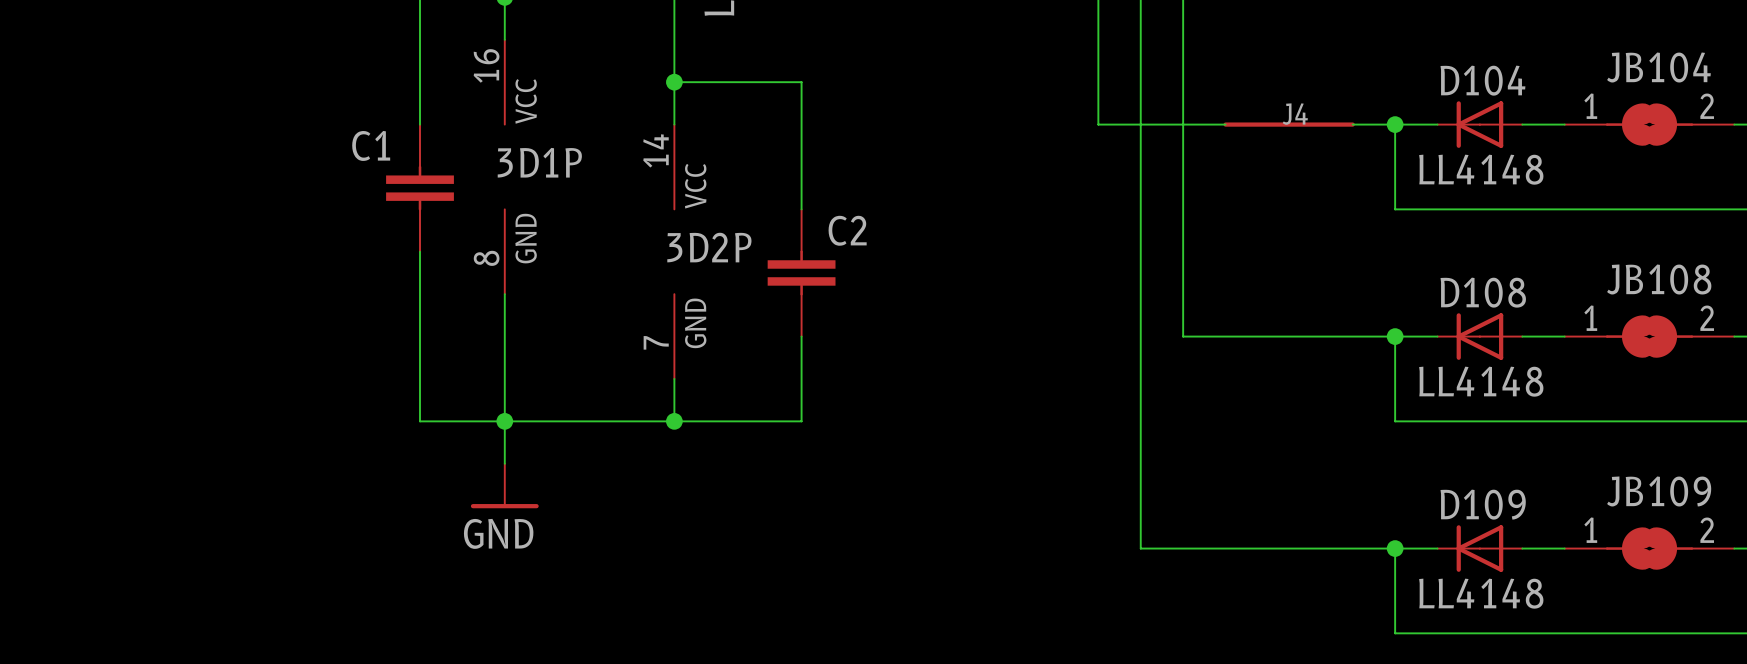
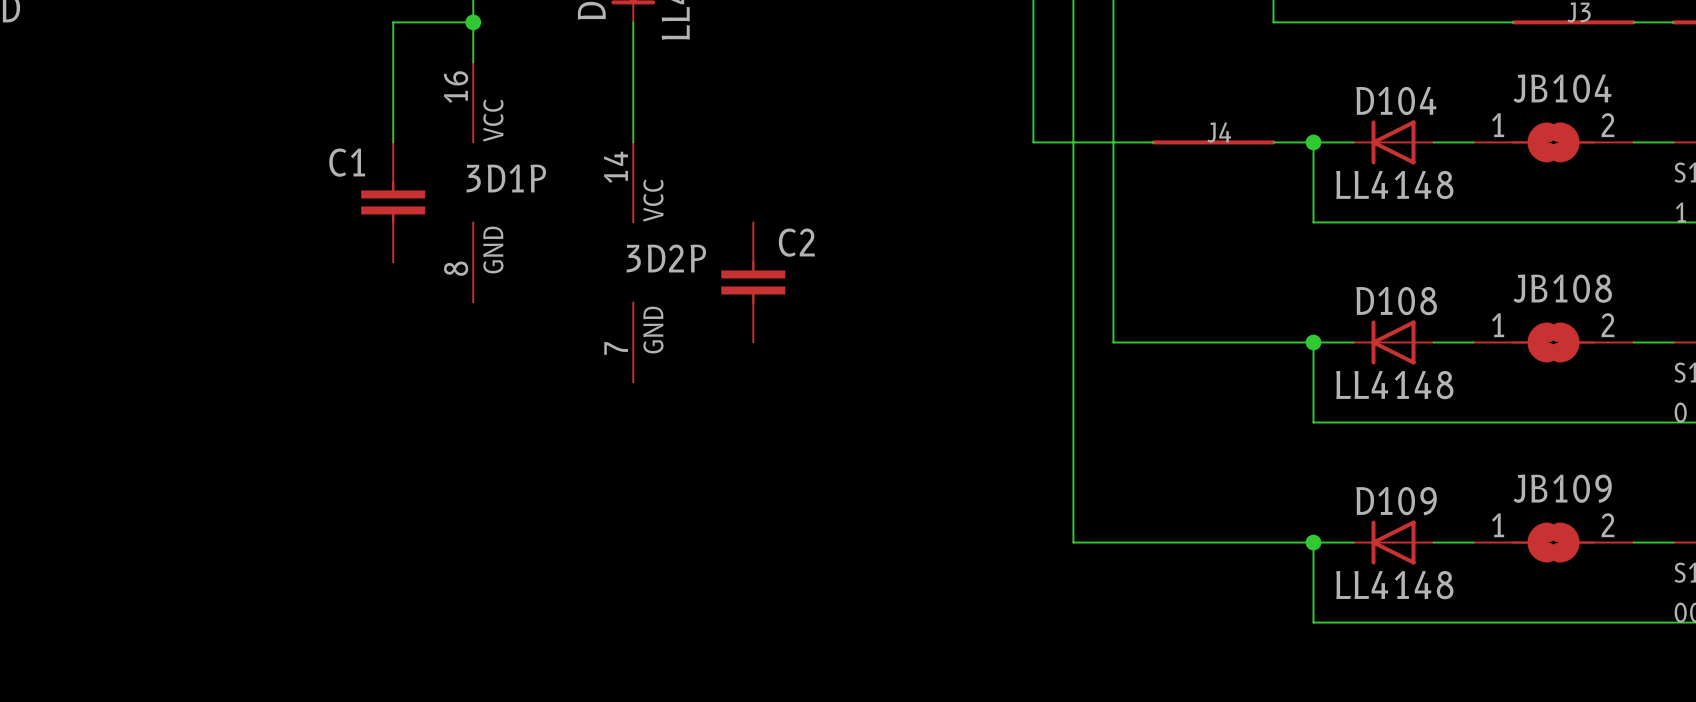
wire: (674, 82) (801, 82) (801, 209) -> none
junction: (674, 82) -> none
wire: (420, 251) (420, 421) (801, 421) (801, 336) -> none
wire: (504, 294) (504, 463) -> none
wire: (674, 378) (674, 421) -> none
junction: (504, 421) -> none
junction: (674, 421) -> none
power symbol: GND (504, 486) -> none

